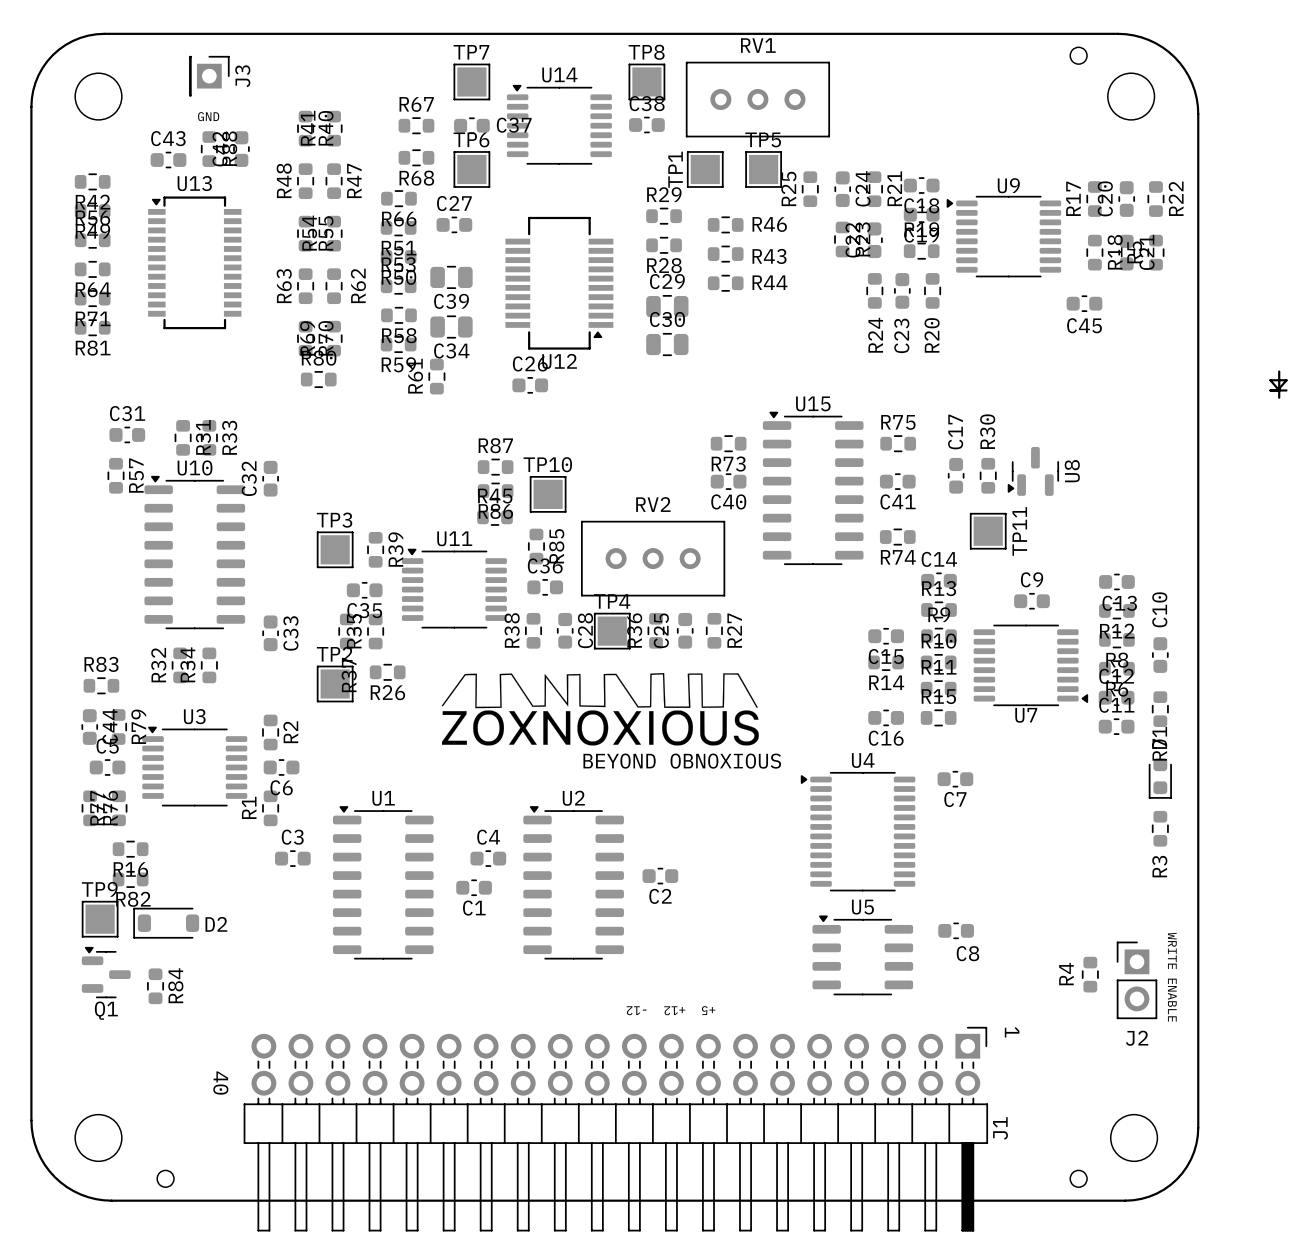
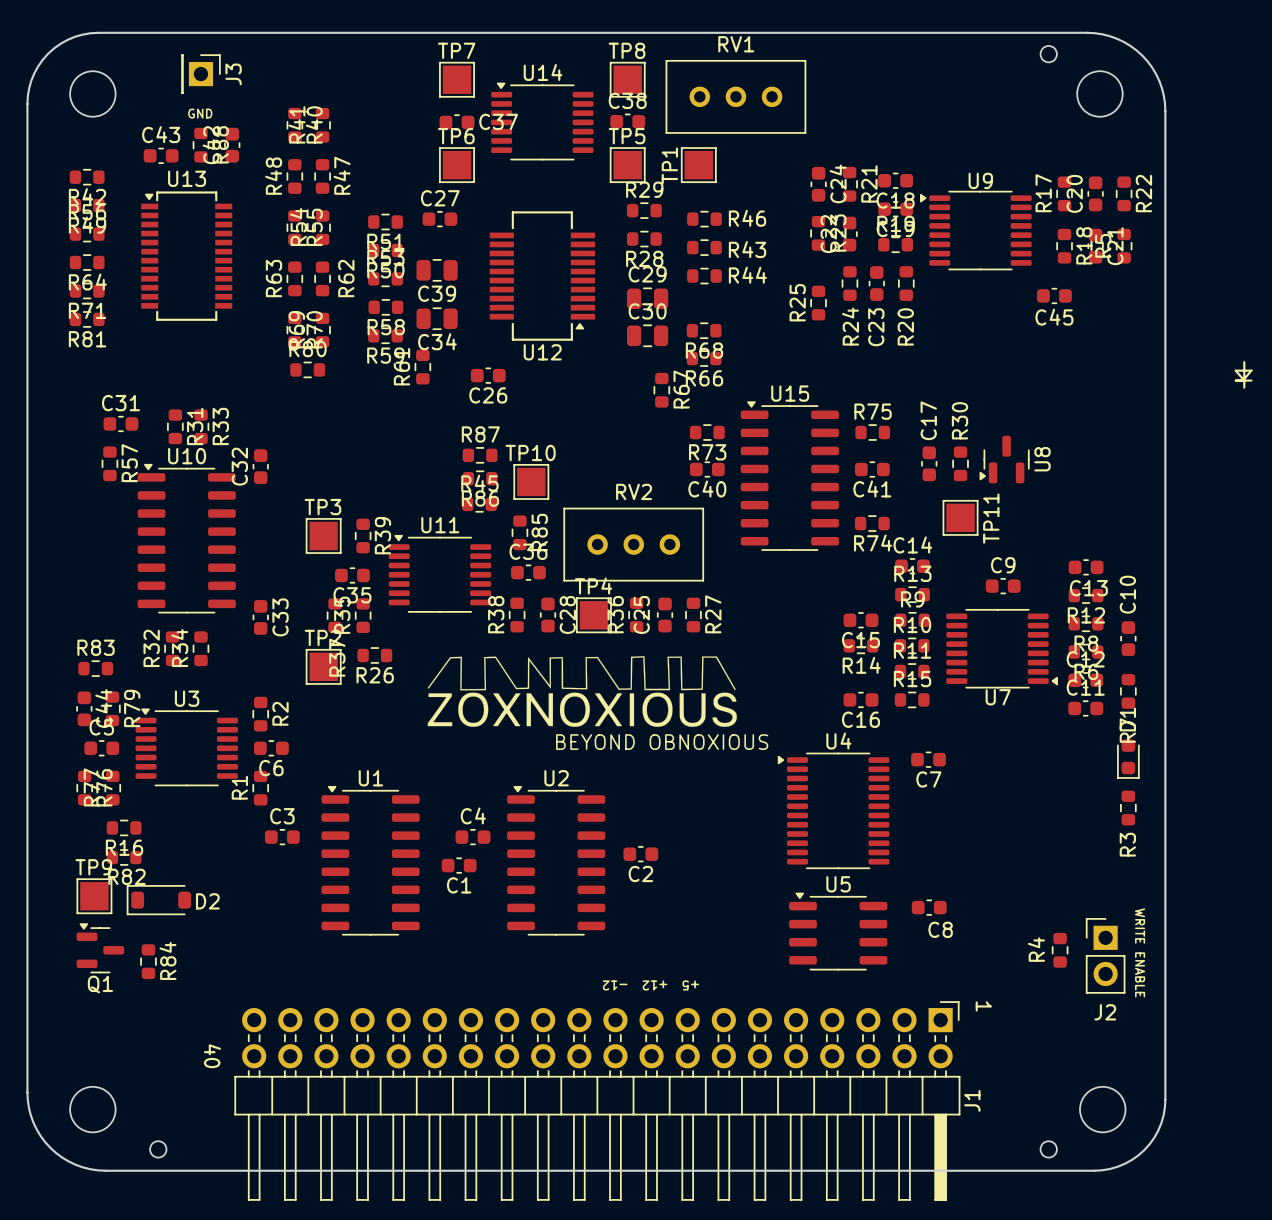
R67 rotation: 0° (416, 125) -> 90° clockwise (661, 390)
R67 position: (416, 125) -> (661, 390)
R68 position: (416, 157) -> (704, 330)
TP1 position: (705, 169) -> (698, 165)
TP5 position: (763, 169) -> (627, 165)
R25 position: (810, 189) -> (818, 303)
R66 position: (398, 198) -> (704, 358)
C26 name position: C26 (530, 363) -> C26 (488, 395)
C26 position: (530, 385) -> (488, 375)

